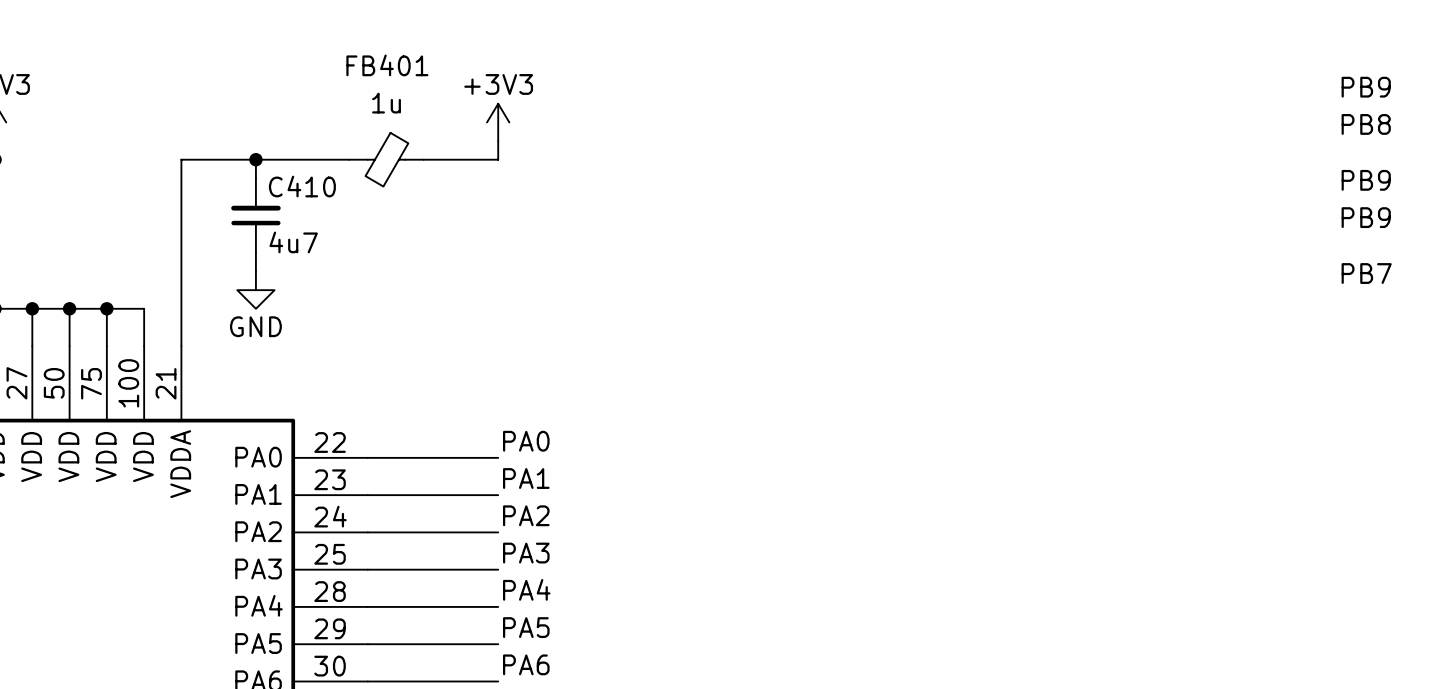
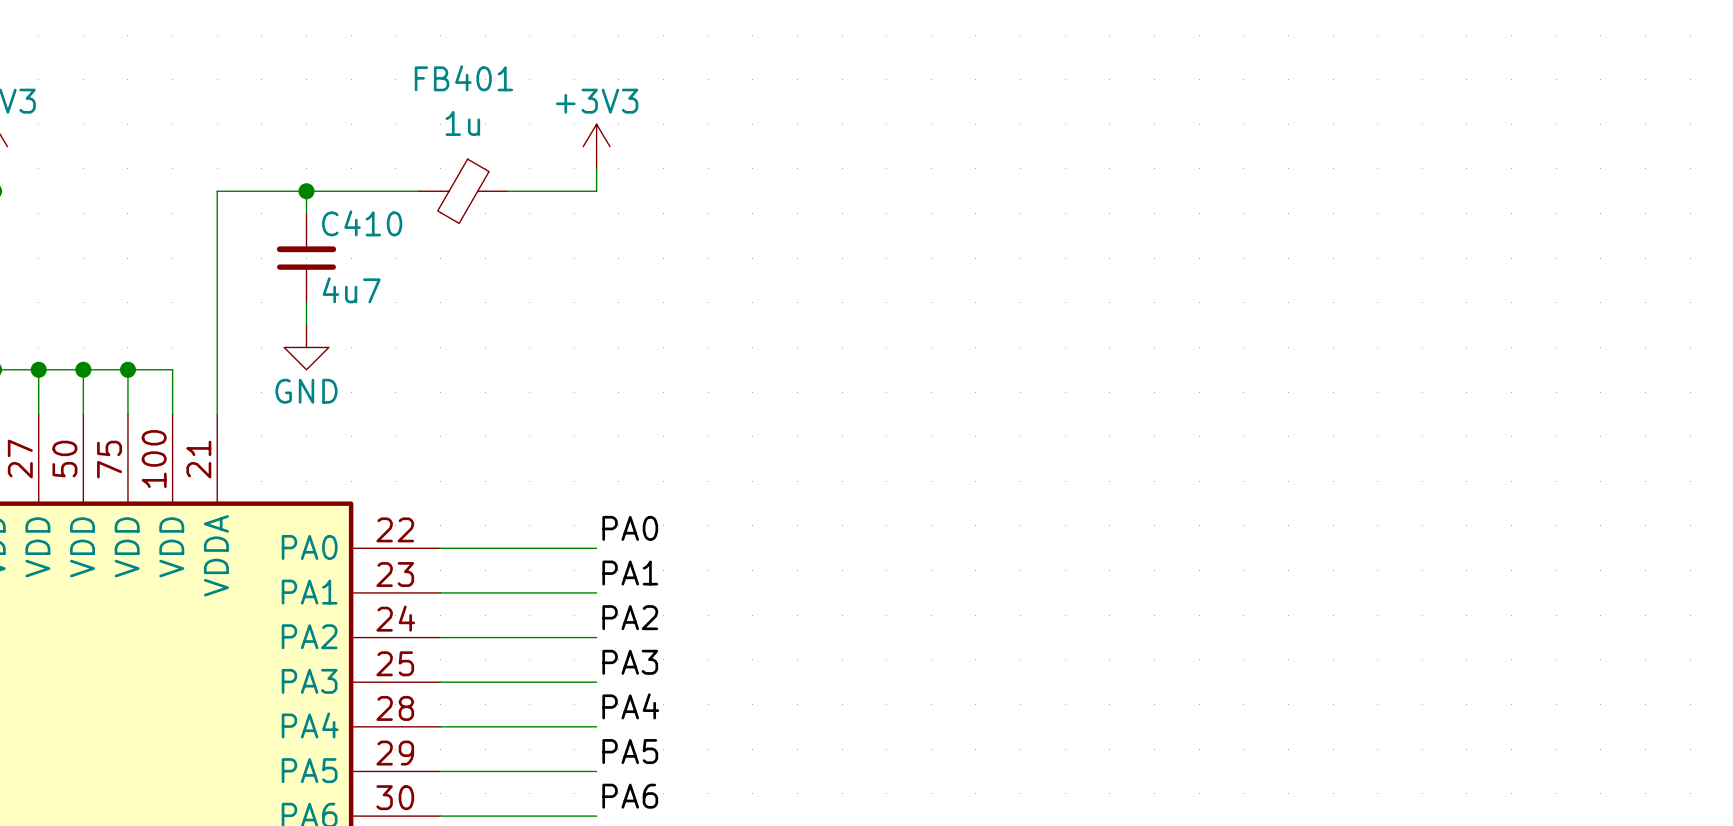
label: PB9 (1366, 87) -> none
label: PB8 (1366, 124) -> none
label: PB9 (1366, 180) -> none
label: PB9 (1366, 217) -> none
label: PB7 (1366, 273) -> none

